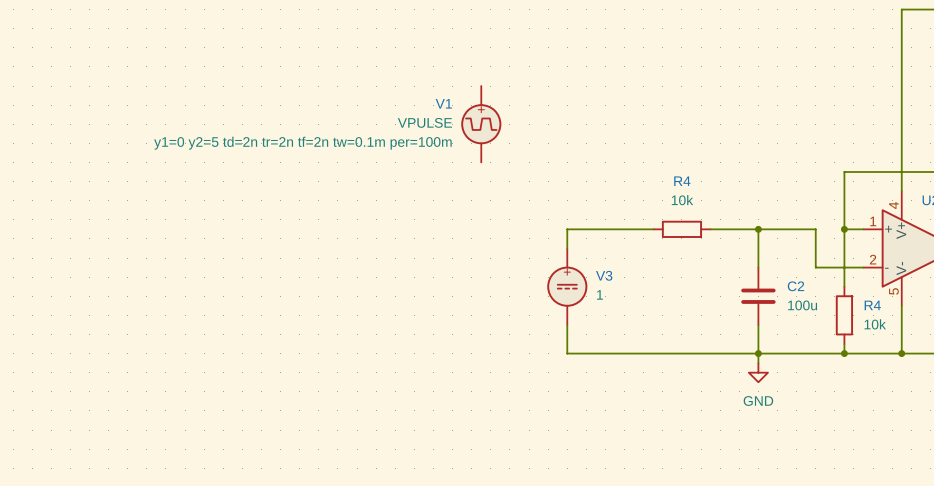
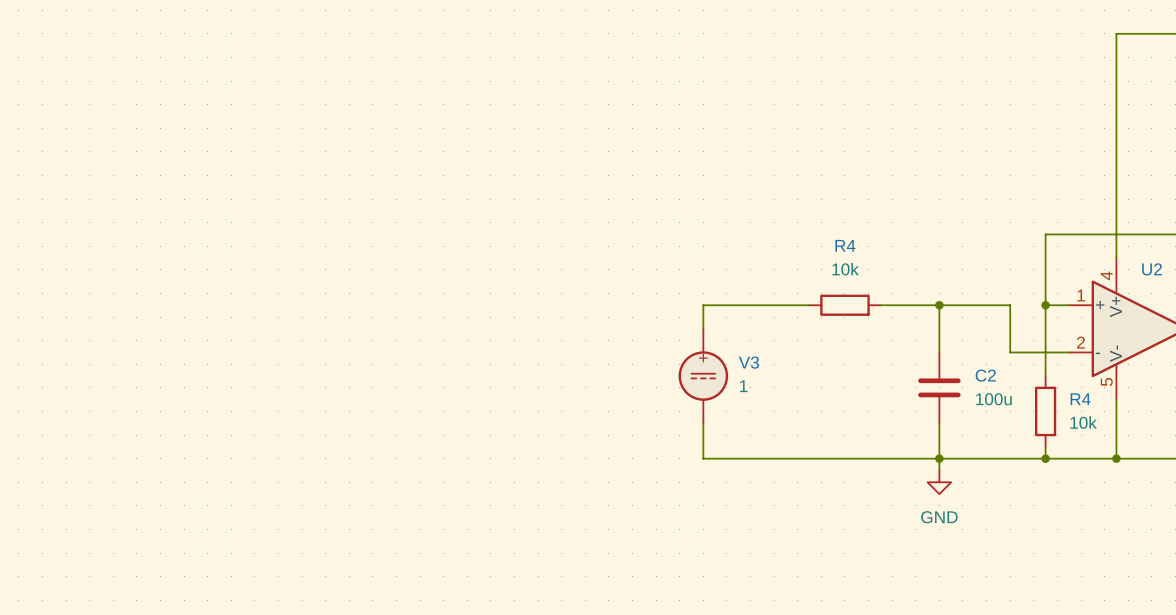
V1: VPULSE (481, 124) -> none

